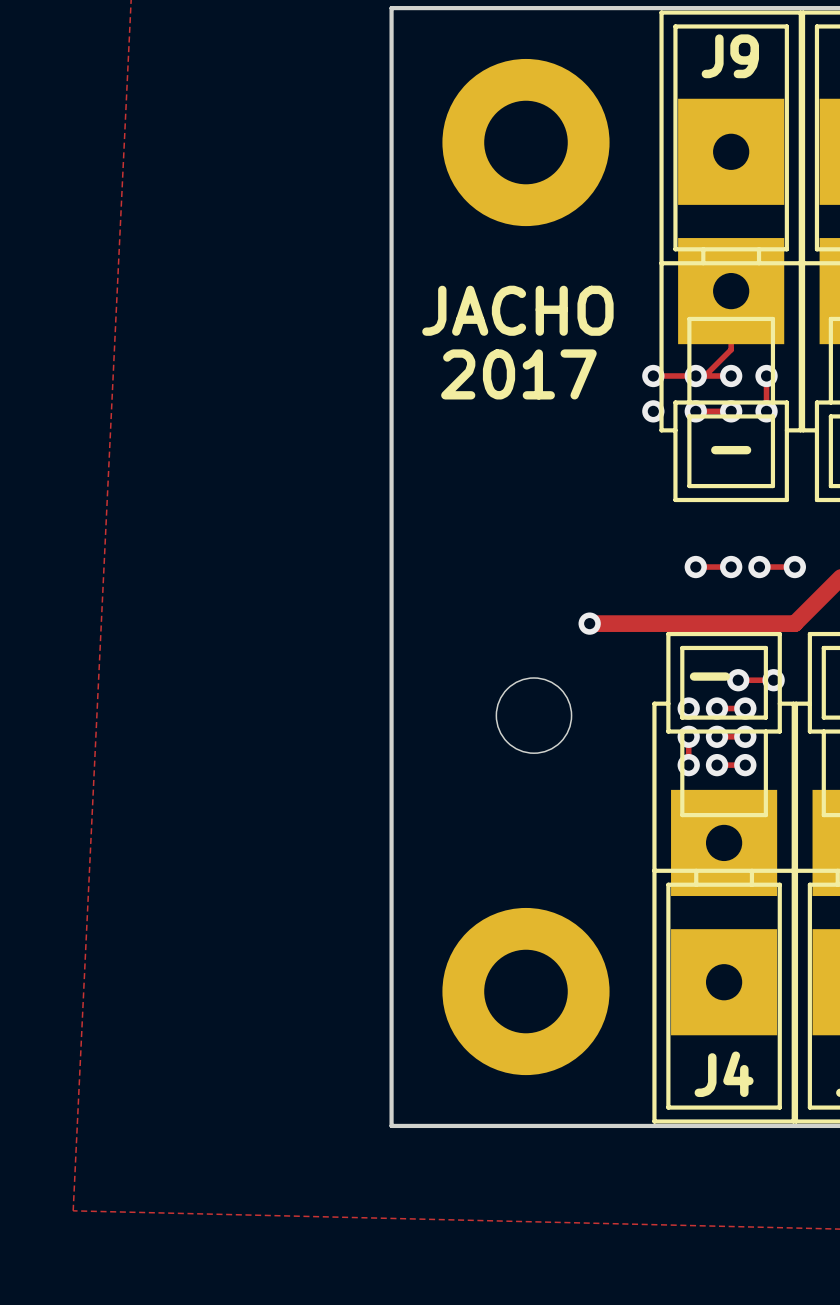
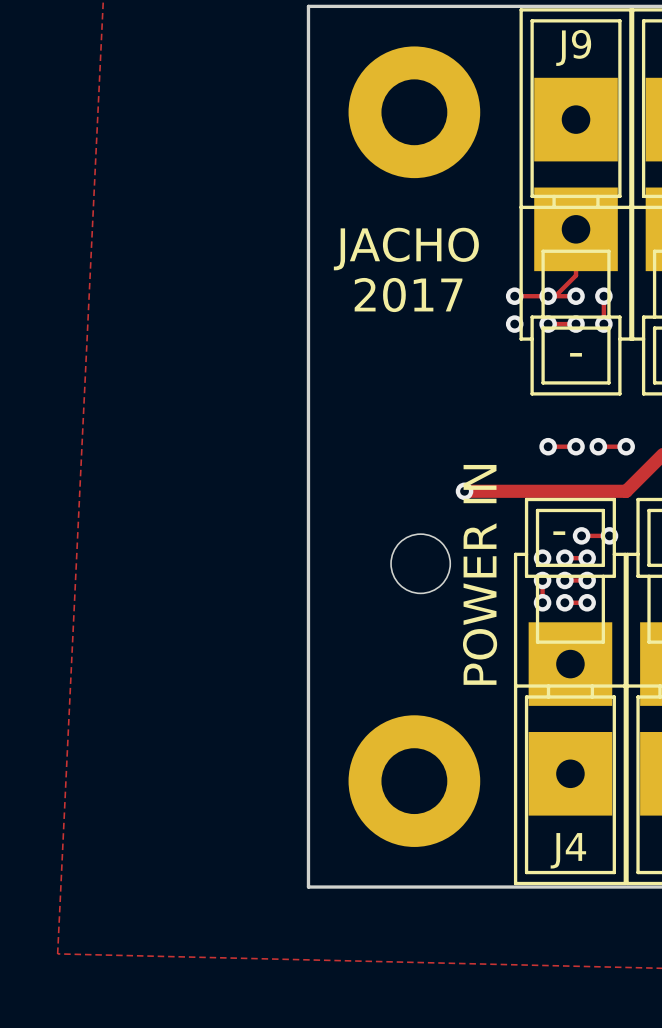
text: none -> POWER IN (480, 574)

